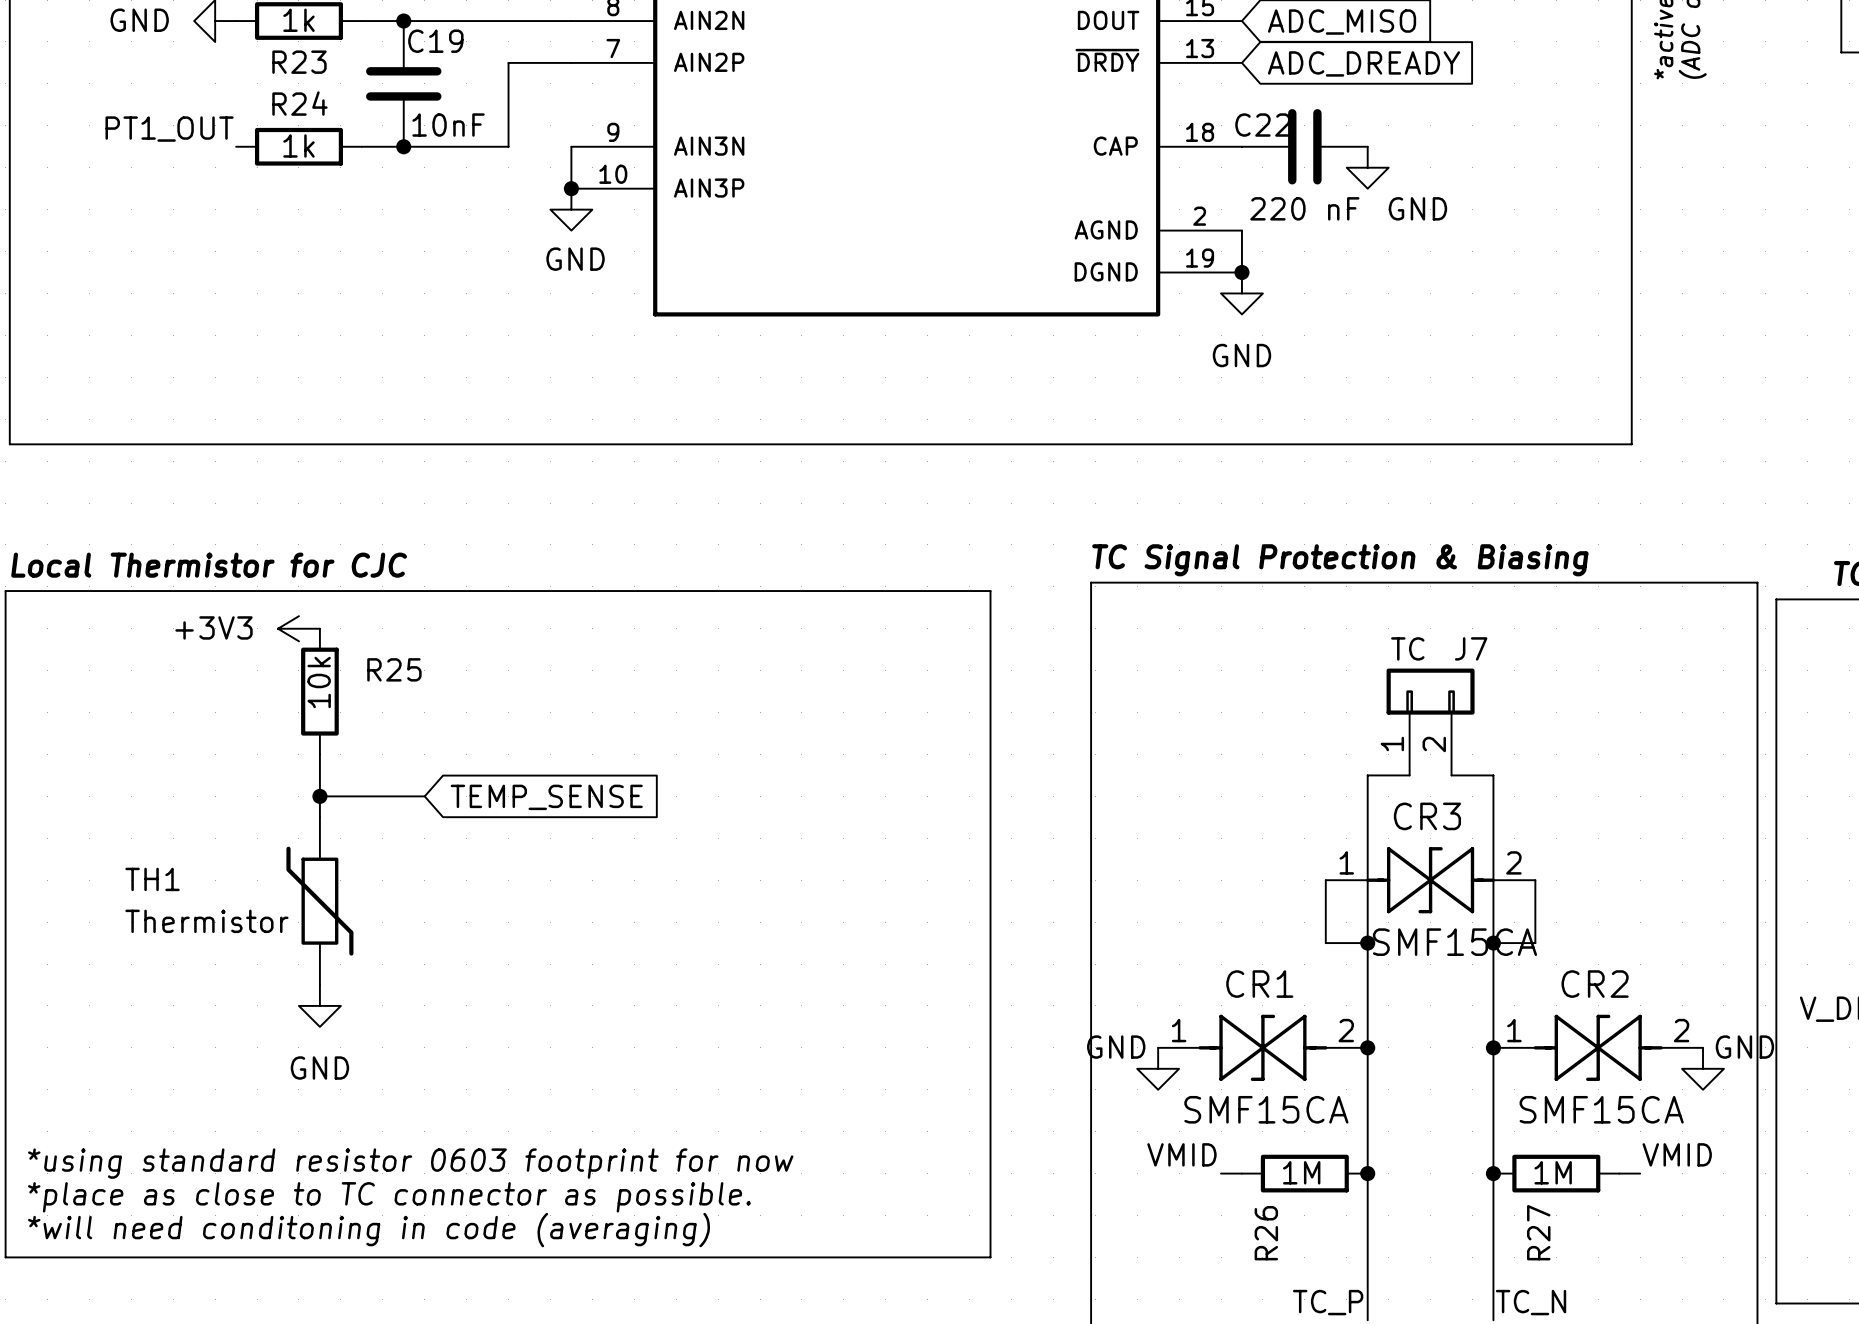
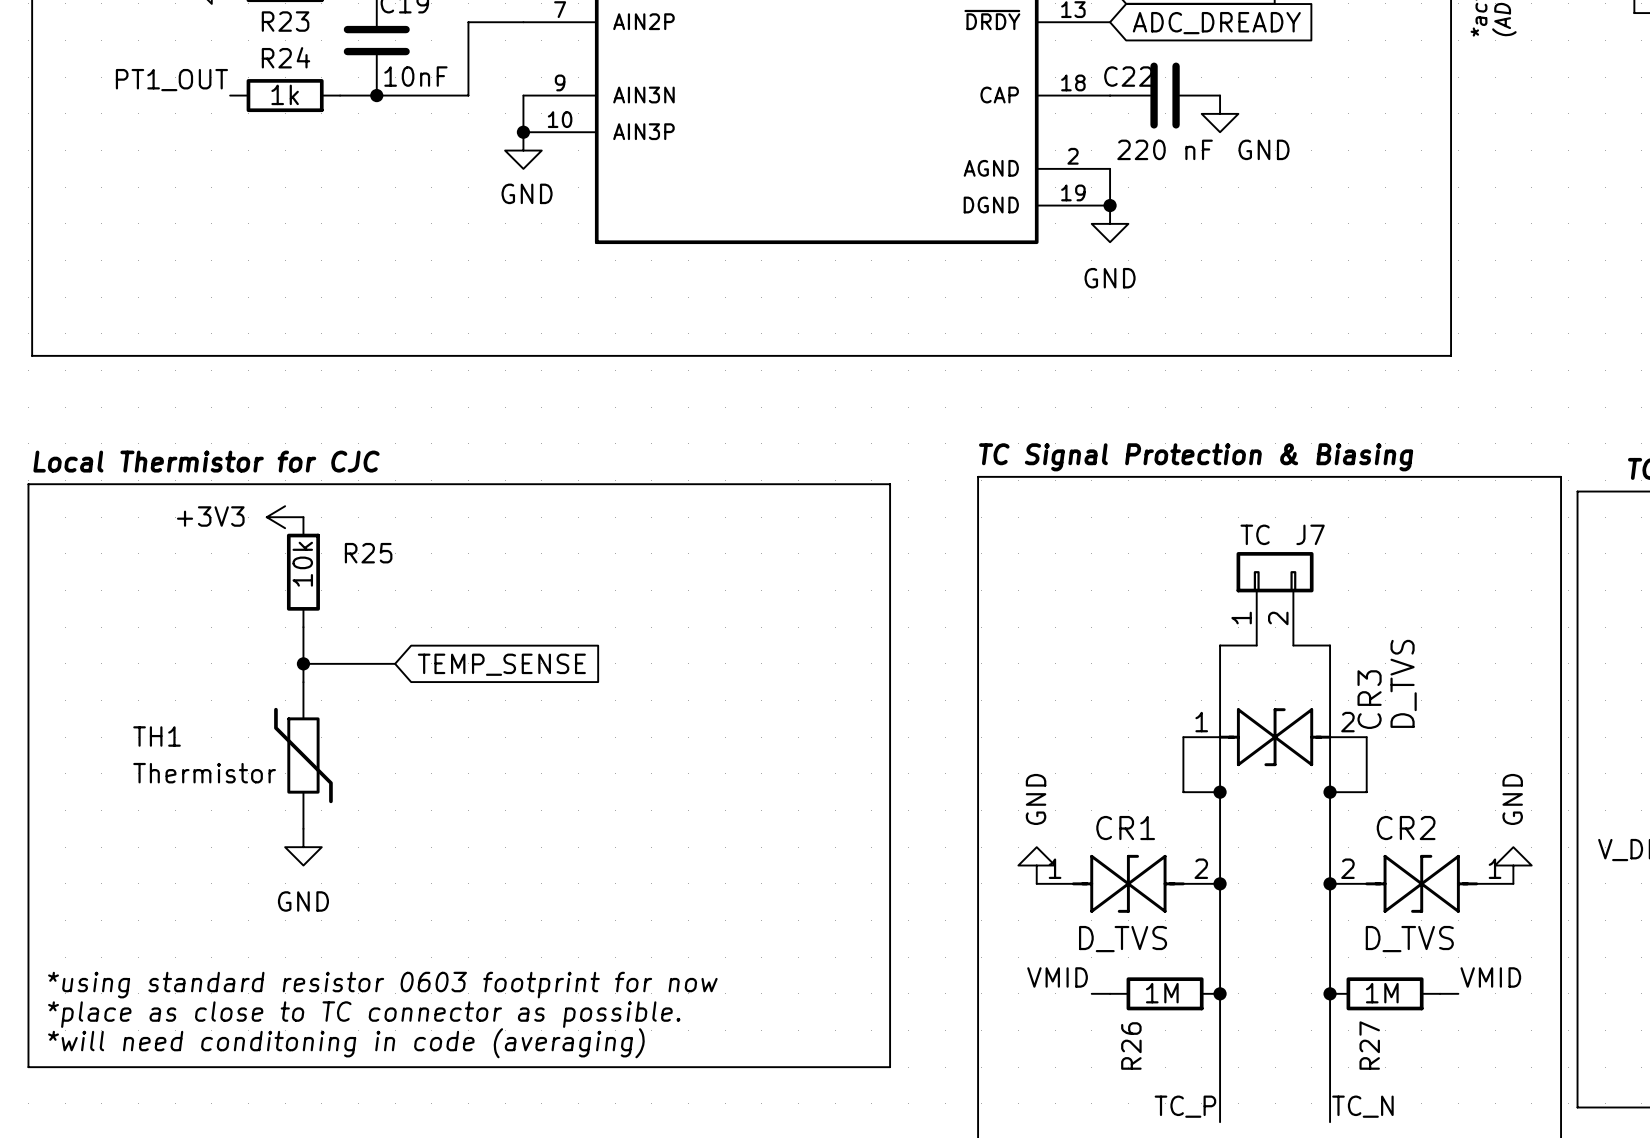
CR3 name rotation: 0° (1427, 816) -> 90° counterclockwise (1369, 699)
CR3 name position: CR3 (1427, 816) -> CR3 (1369, 699)
CR3 value: SMF15CA (1454, 942) -> D_TVS (1403, 683)
power symbol text position: GND (1116, 1047) -> GND (1036, 799)
CR2 rotation: 0° (1598, 1047) -> 180° (1421, 883)
power symbol text position: GND (1744, 1047) -> GND (1512, 799)
power symbol rotation: 0° (1158, 1068) -> 180° (1036, 865)
power symbol position: GND (1158, 1068) -> GND (1036, 865)
power symbol rotation: 0° (1703, 1068) -> 180° (1513, 865)
power symbol position: GND (1703, 1068) -> GND (1513, 865)
CR1 value: SMF15CA (1266, 1109) -> D_TVS (1123, 939)
CR2 value: SMF15CA (1601, 1109) -> D_TVS (1409, 939)

